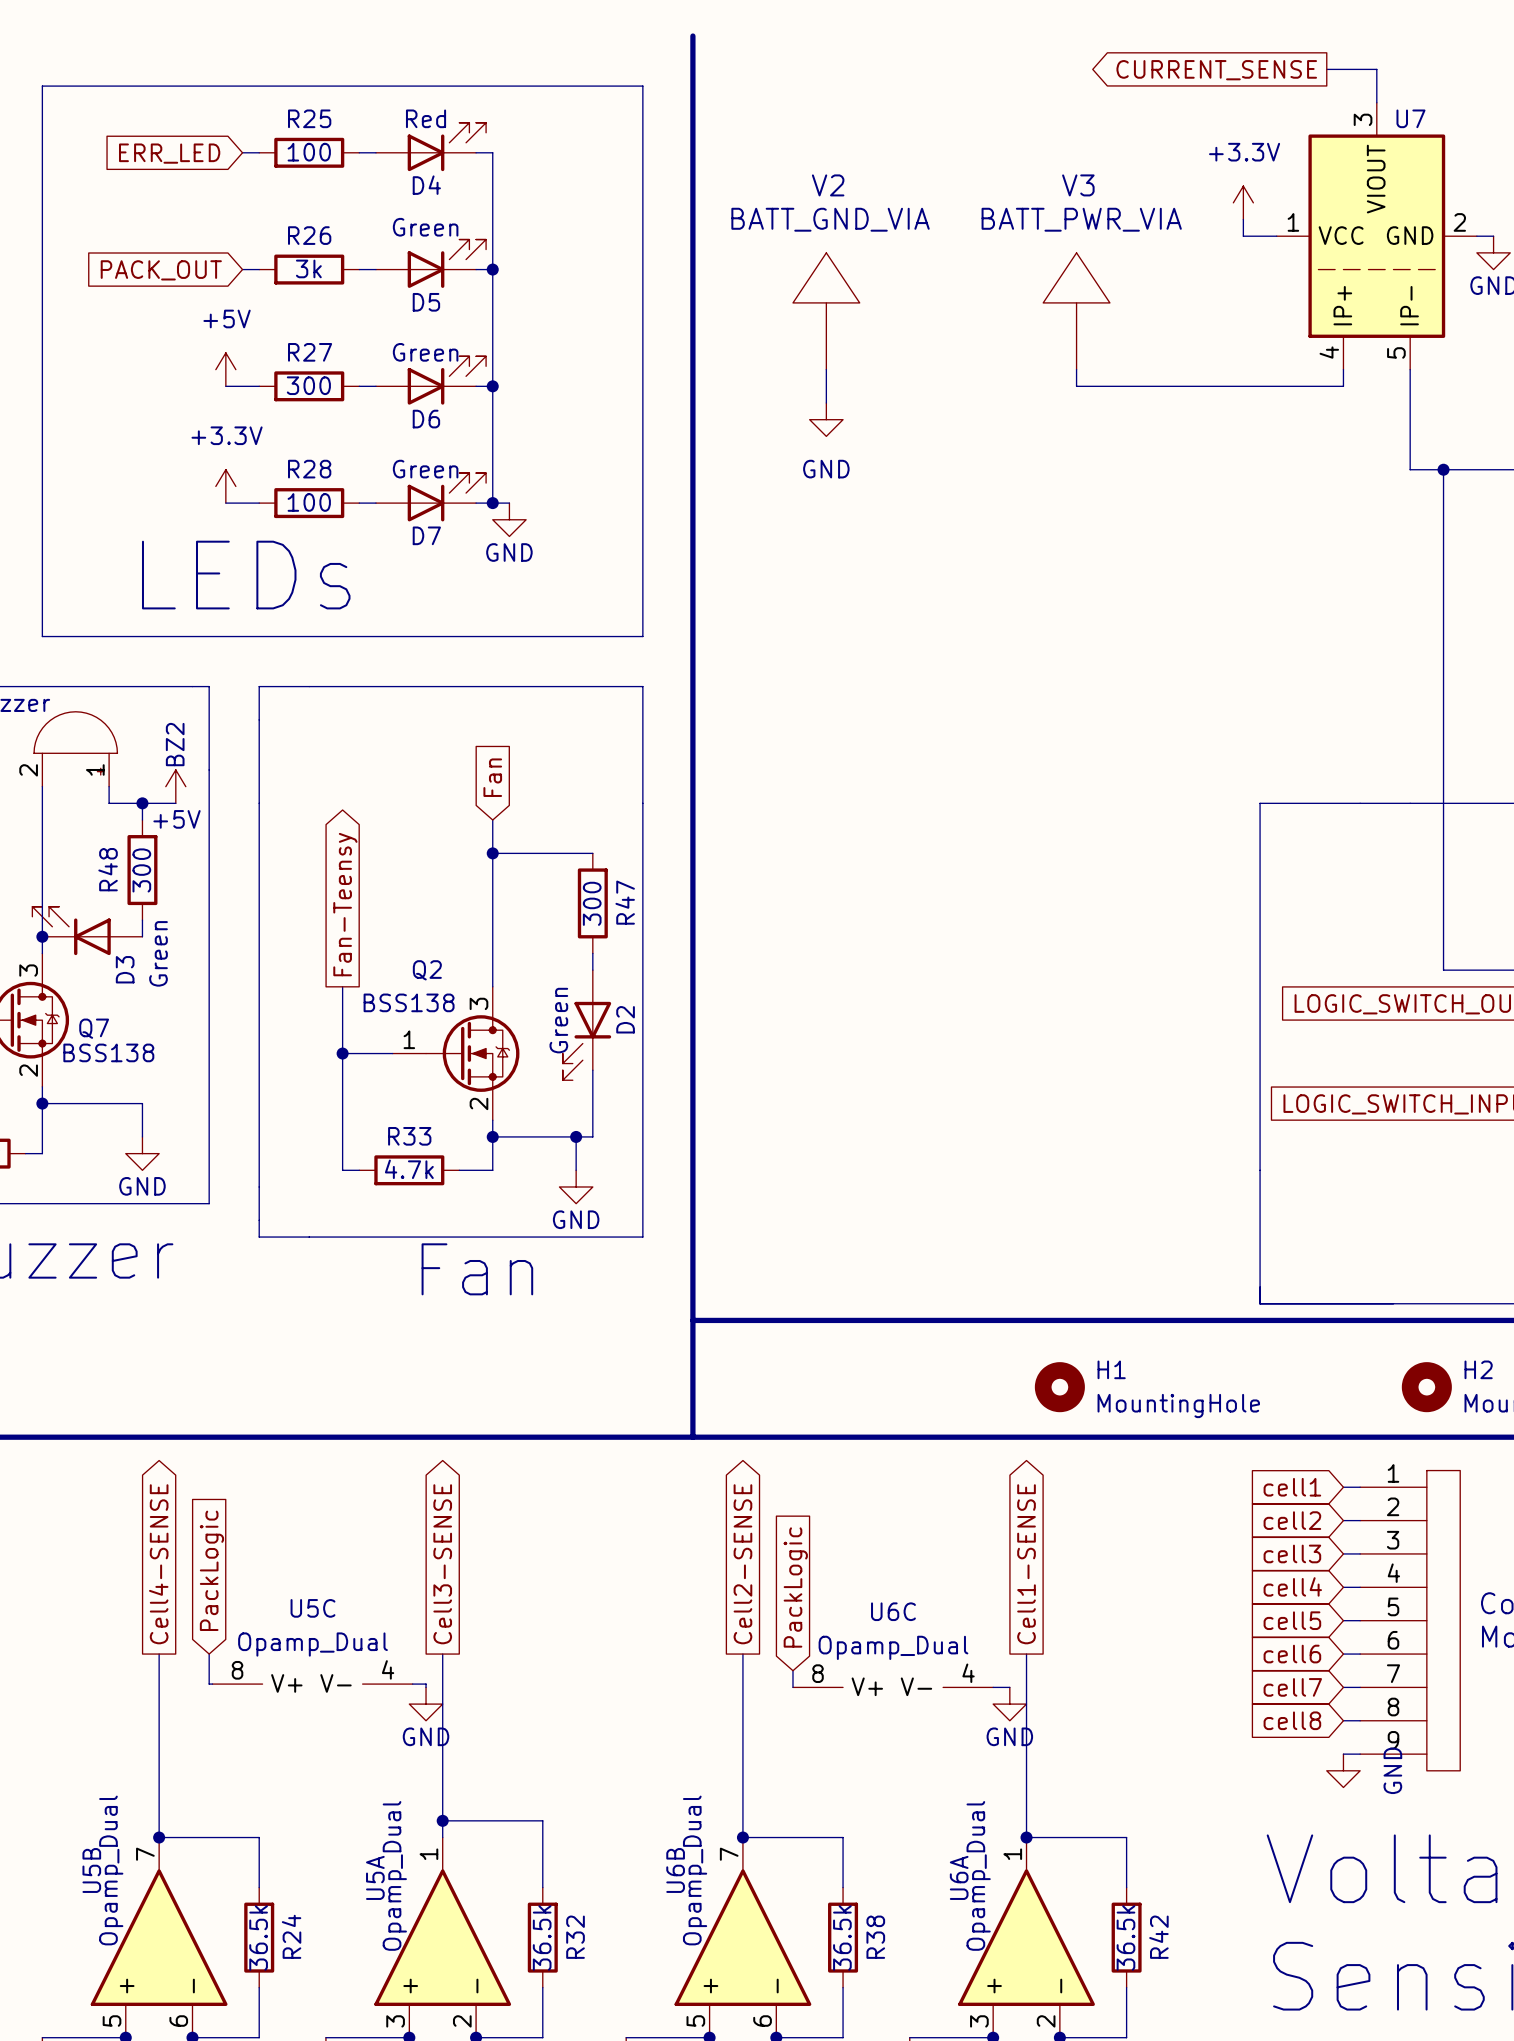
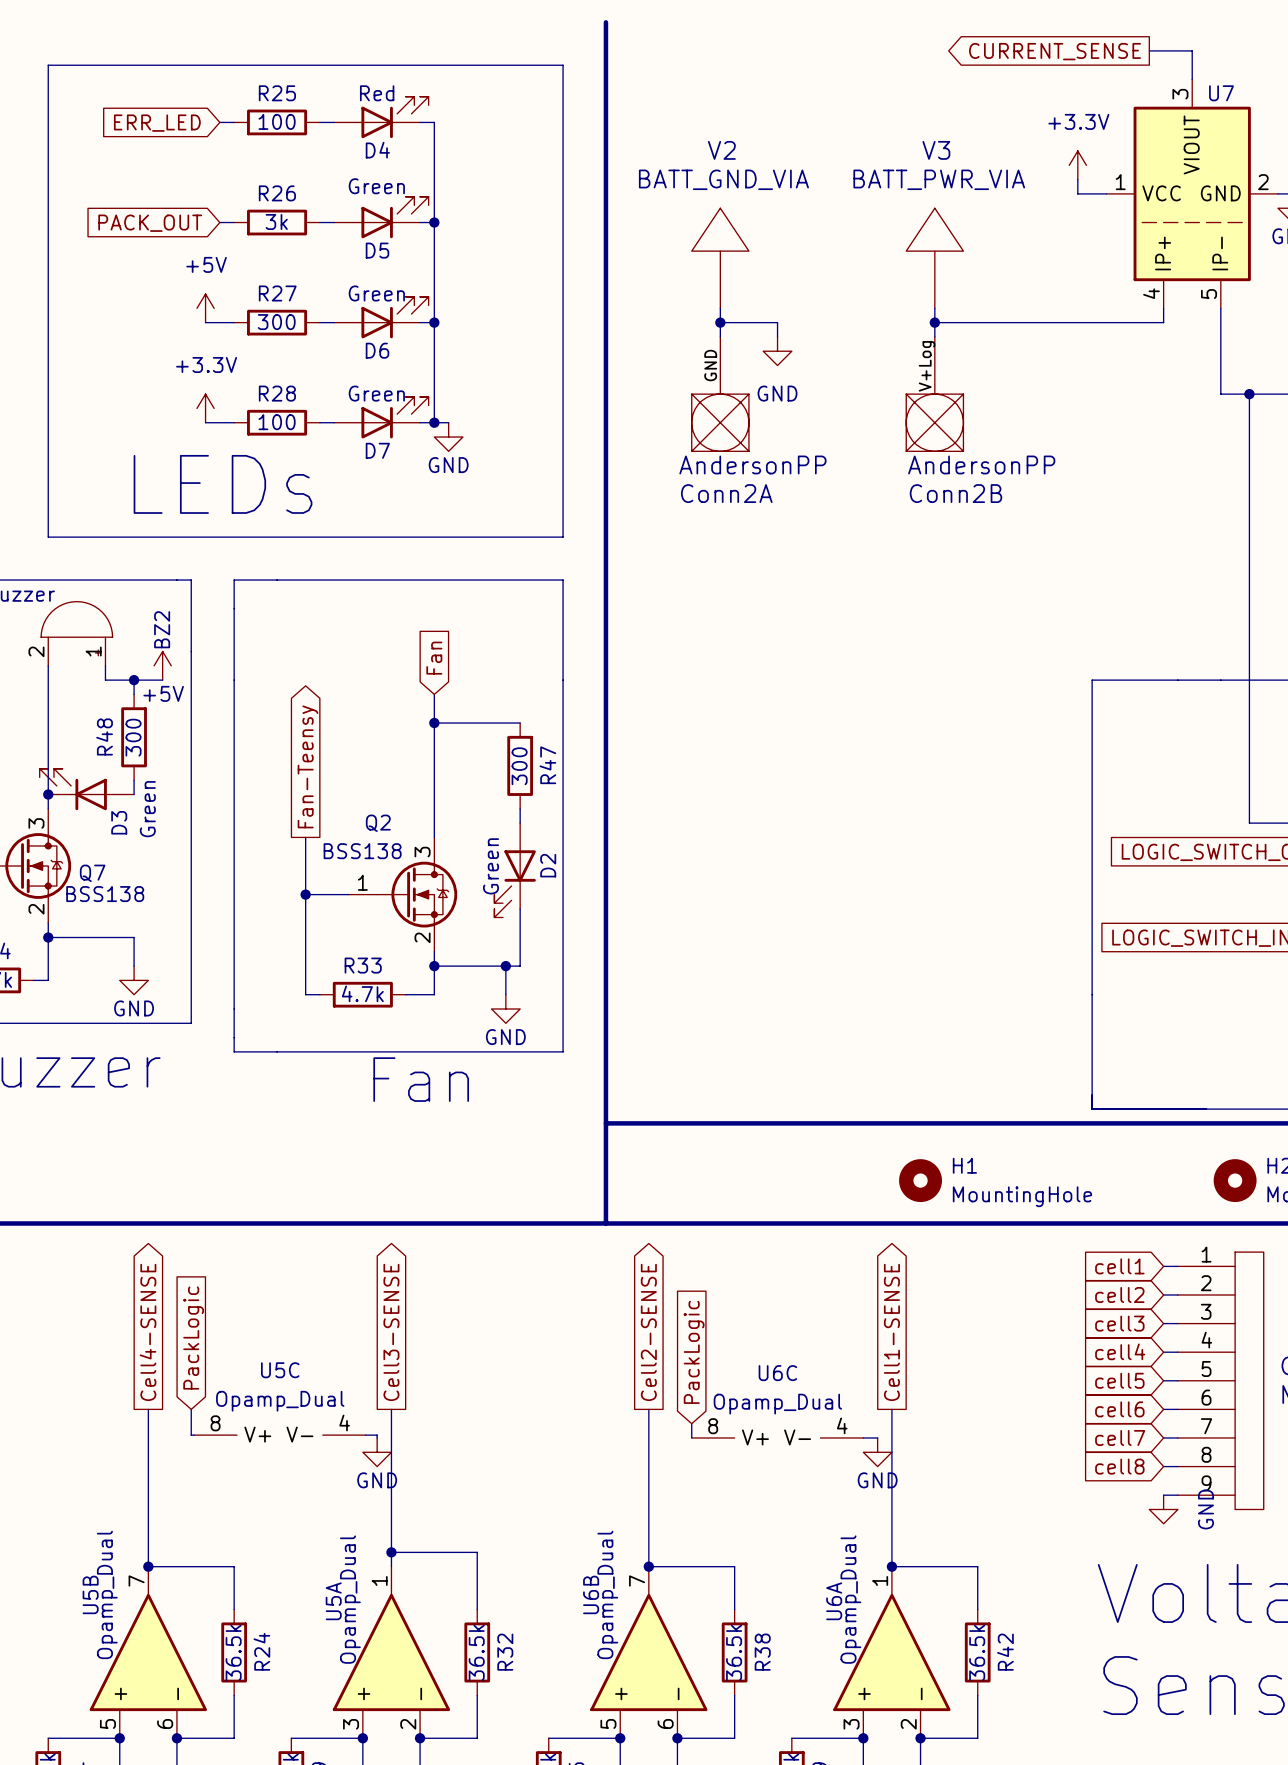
wire: none -> (720, 322) (777, 322) (777, 336)
junction: none -> (720, 322)
wire: none -> (934, 322) (934, 336)
junction: none -> (934, 322)
power symbol position: GND (826, 419) -> GND (777, 351)
Conn2A: none -> AndersonPP (720, 394)
Conn2B: none -> AndersonPP (934, 394)

